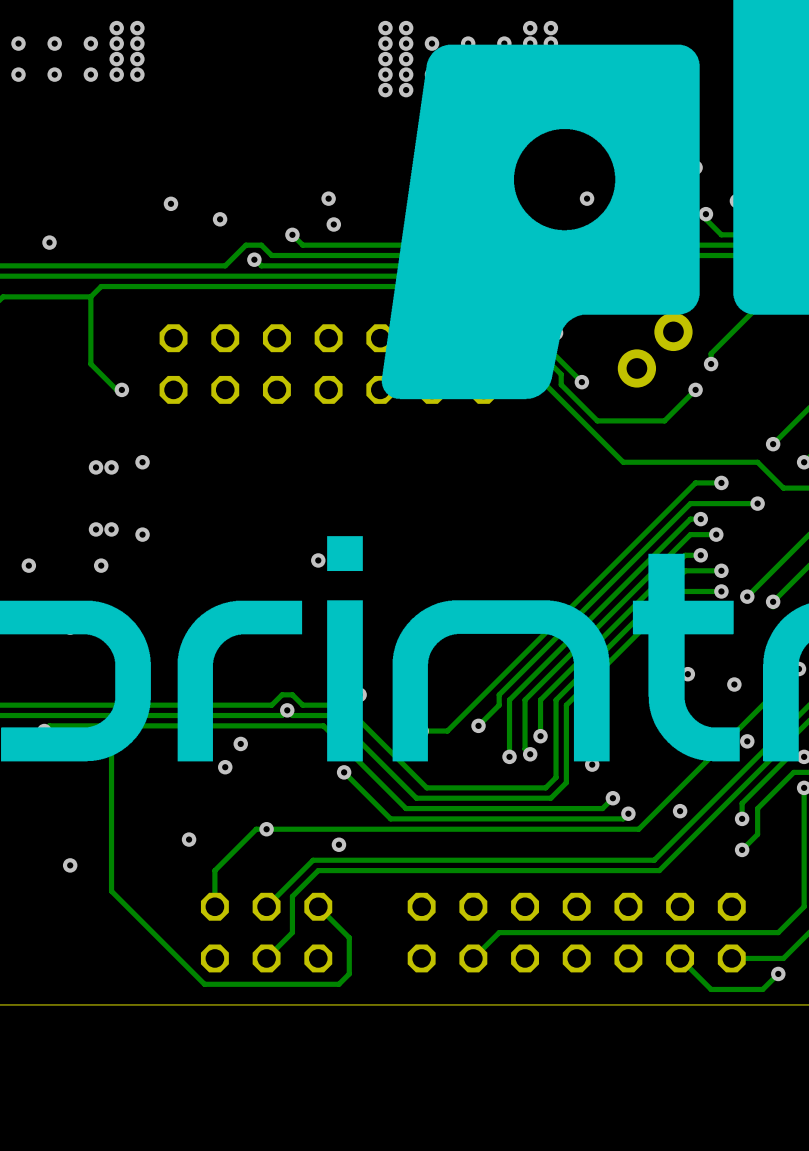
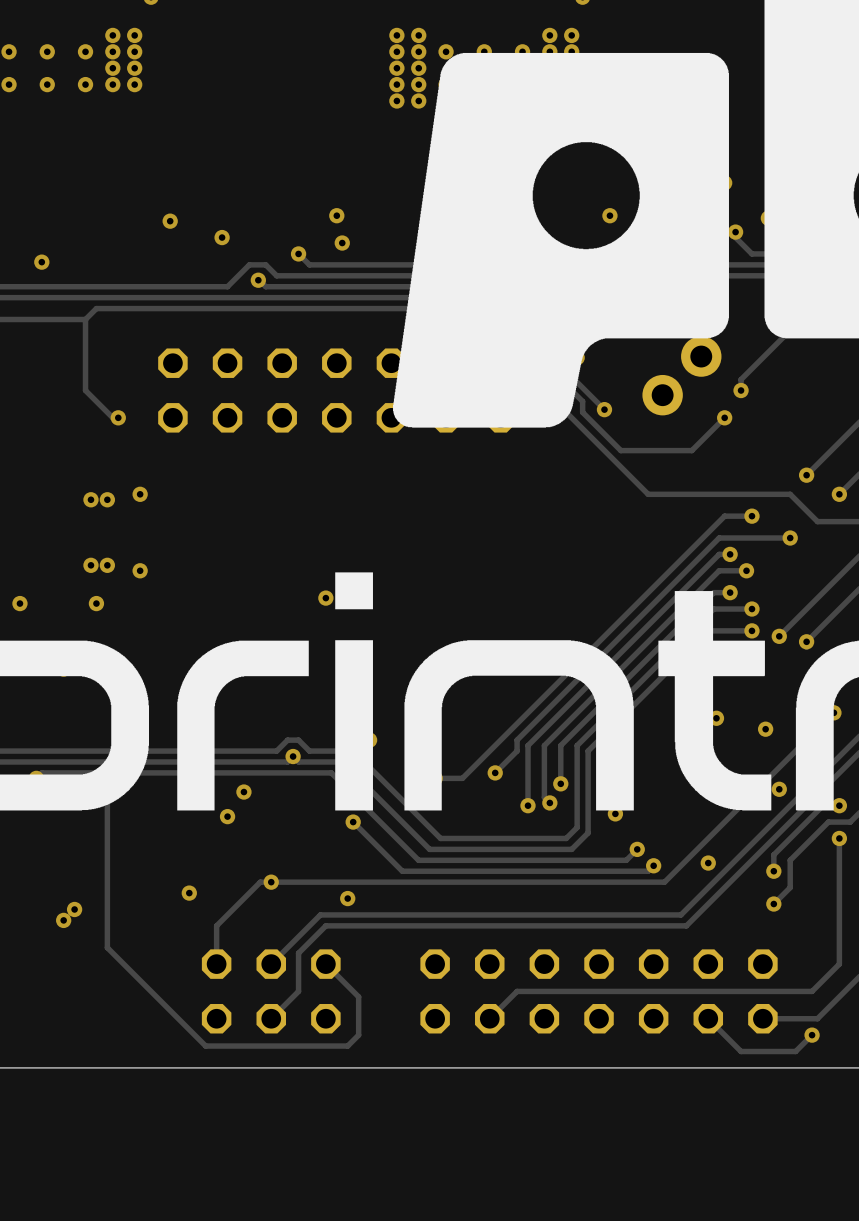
via: none -> (74, 909)

